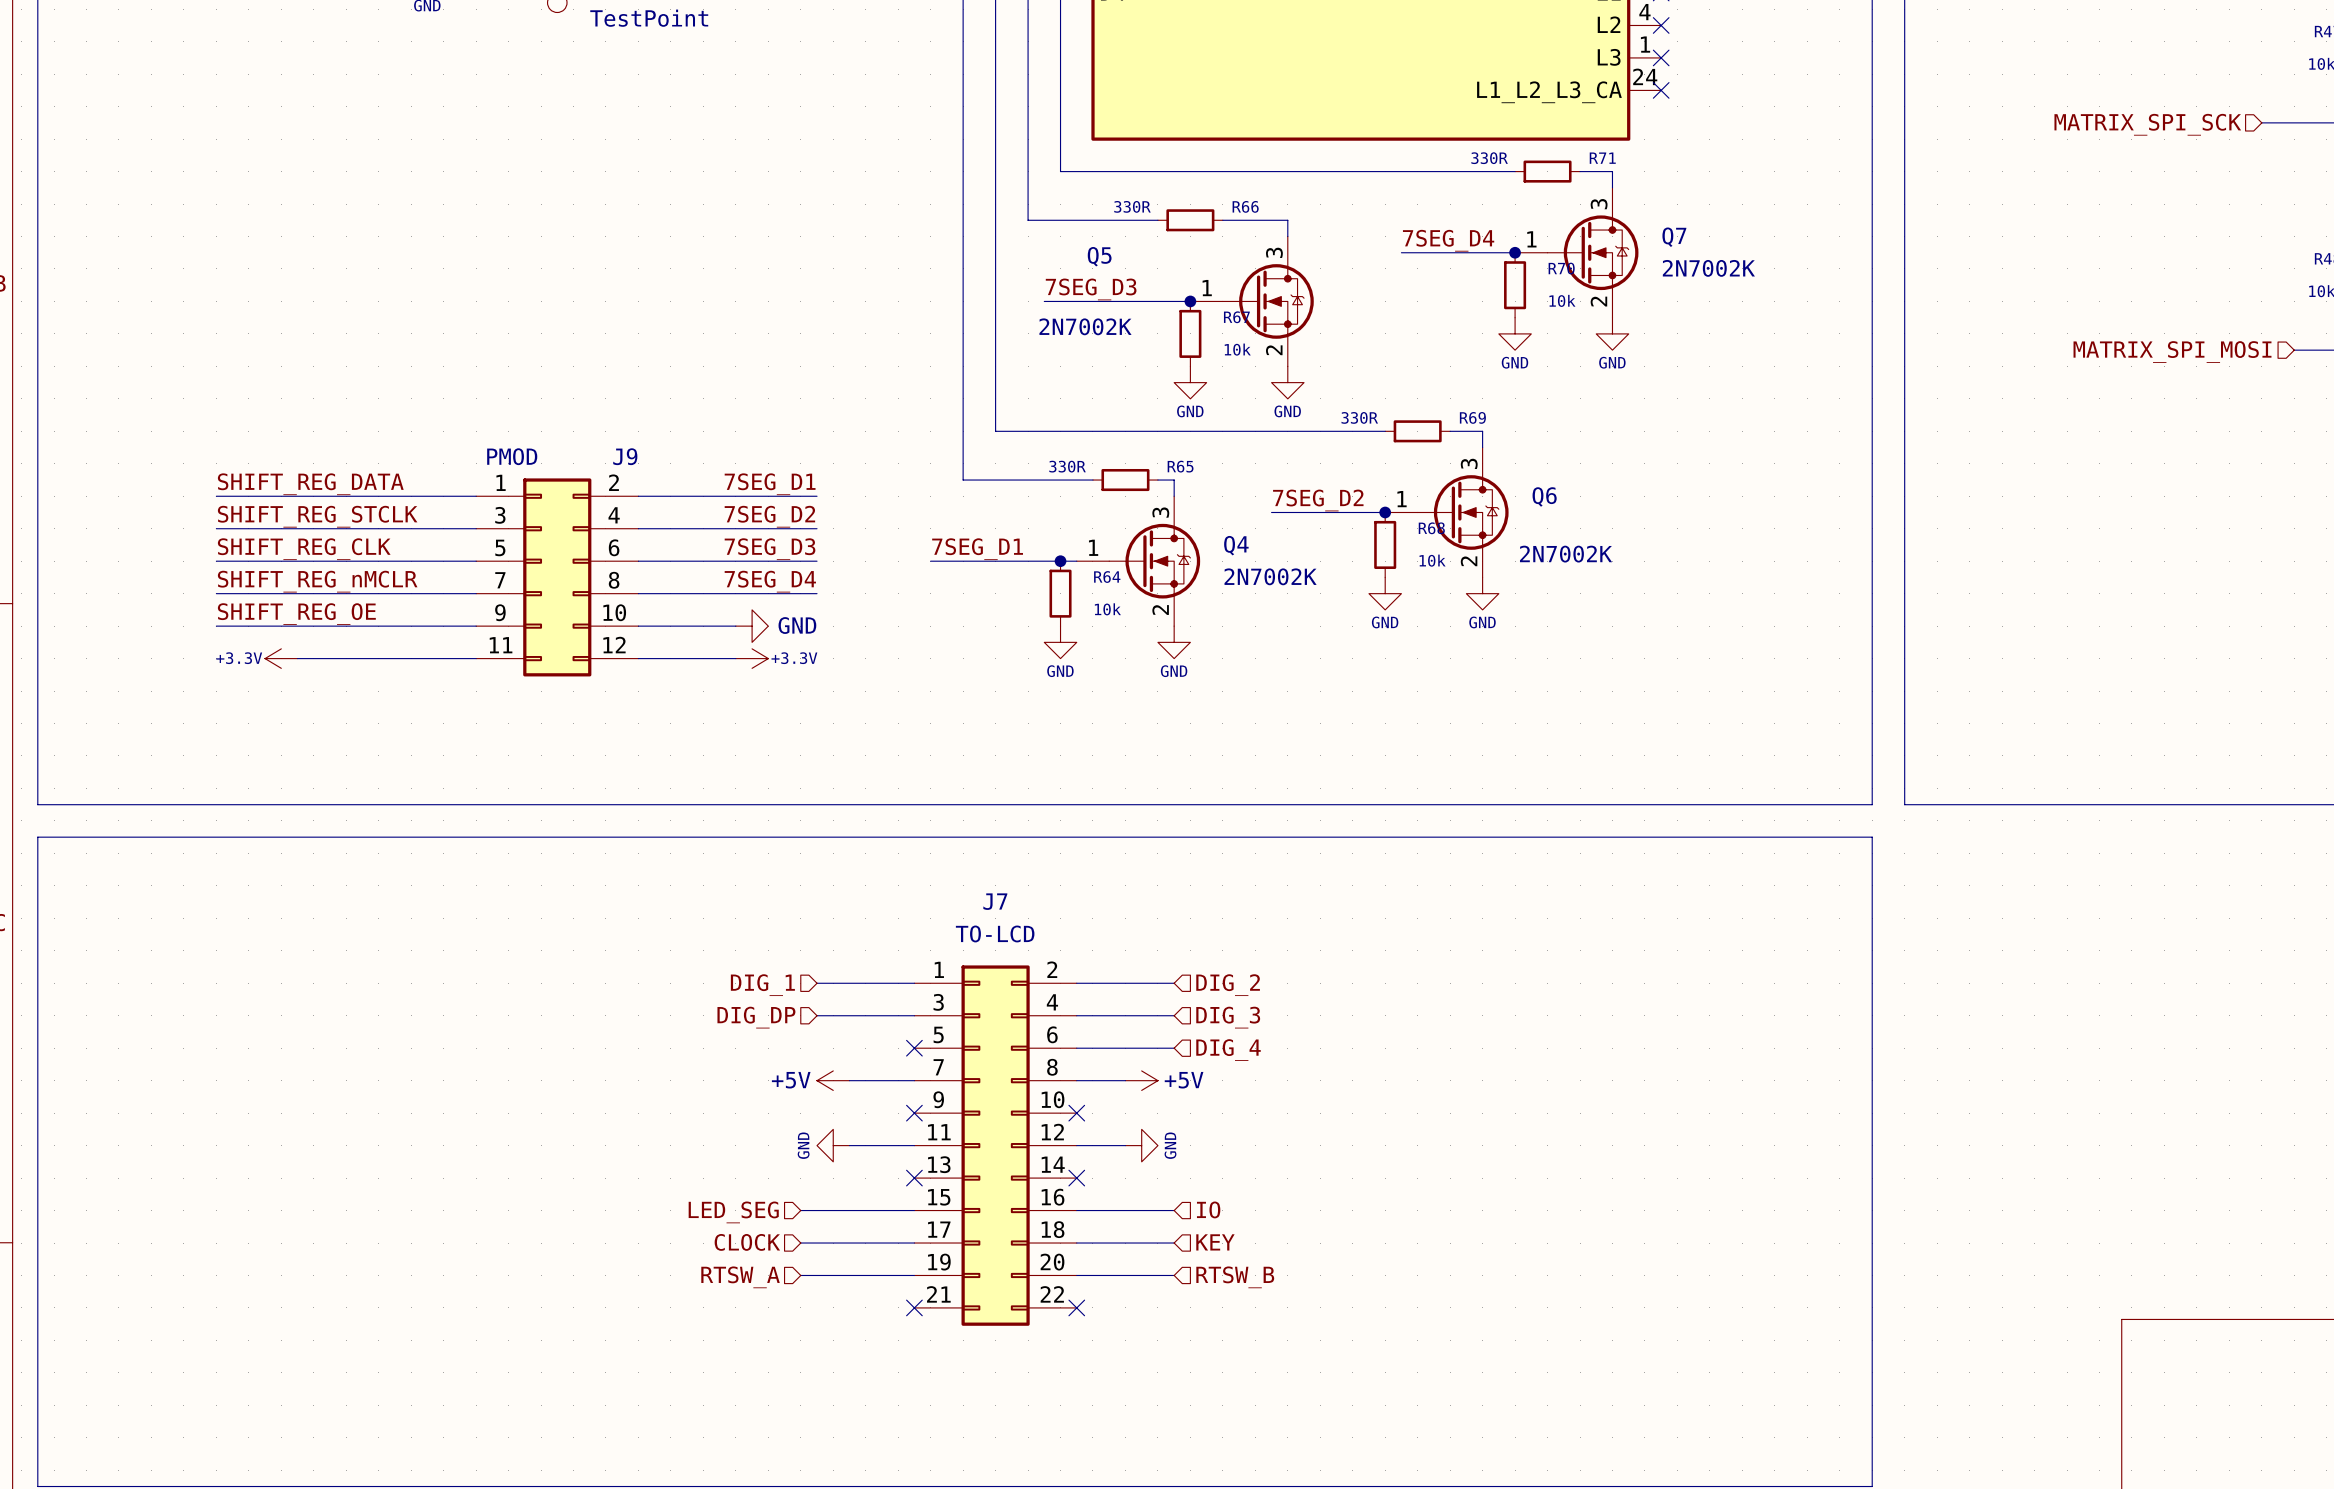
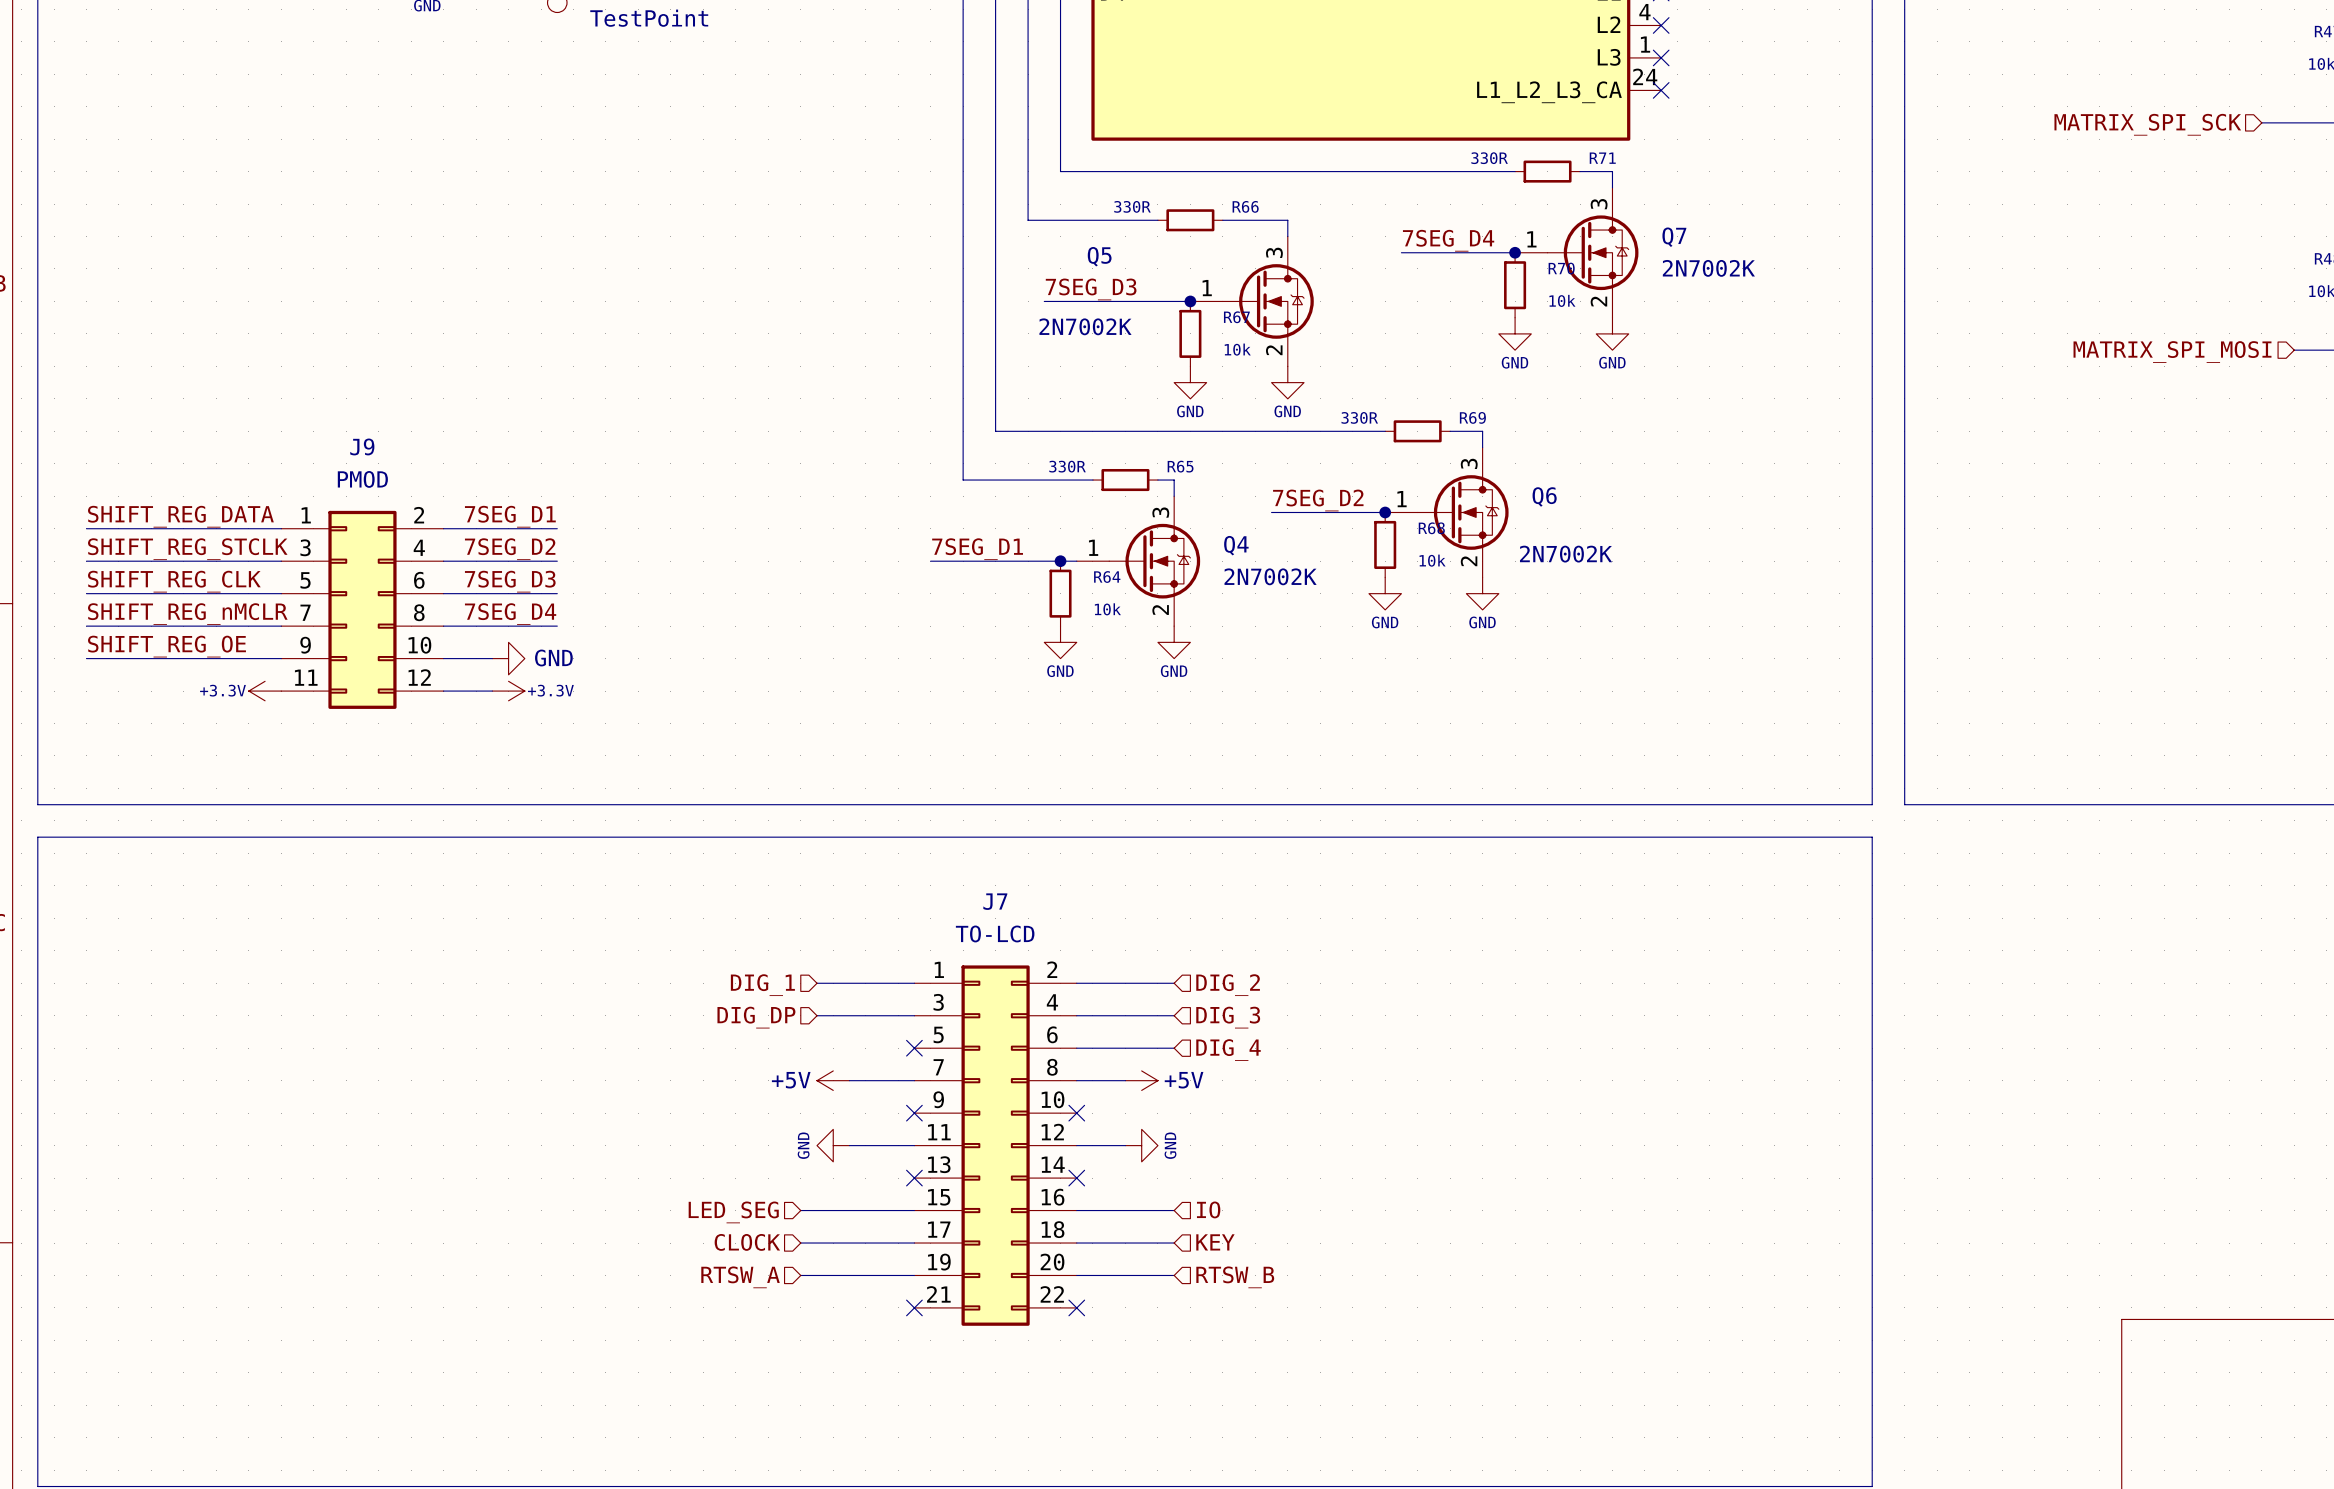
J9 value position: PMOD (512, 456) -> PMOD (362, 479)
J9 name position: J9 (625, 456) -> J9 (362, 446)
label position: SHIFT_REG_DATA (310, 484) -> SHIFT_REG_DATA (180, 516)
label position: 7SEG_D1 (770, 484) -> 7SEG_D1 (510, 516)
wire: (216, 496) (476, 496) -> none
wire: (638, 496) (817, 496) -> none
label position: SHIFT_REG_STCLK (317, 516) -> SHIFT_REG_STCLK (187, 549)
label position: 7SEG_D2 (769, 516) -> 7SEG_D2 (510, 549)
wire: none -> (86, 528) (216, 528)
wire: (638, 528) (817, 528) -> none
label position: SHIFT_REG_CLK (304, 549) -> SHIFT_REG_CLK (174, 581)
label position: 7SEG_D3 (770, 549) -> 7SEG_D3 (510, 581)
wire: none -> (86, 561) (216, 561)
wire: (638, 561) (817, 561) -> none
J9 position: (557, 577) -> (362, 609)
label position: SHIFT_REG_nMCLR (317, 581) -> SHIFT_REG_nMCLR (187, 614)
label position: 7SEG_D4 (770, 581) -> 7SEG_D4 (510, 614)
wire: none -> (86, 593) (216, 593)
wire: (638, 593) (817, 593) -> none
label position: SHIFT_REG_OE (296, 614) -> SHIFT_REG_OE (166, 646)
wire: none -> (86, 626) (216, 626)
wire: (638, 626) (735, 626) -> none
power symbol position: GND (752, 626) -> GND (508, 658)
wire: none -> (86, 658) (281, 658)
power symbol position: +3.3V (281, 658) -> +3.3V (265, 691)
wire: (638, 658) (735, 658) -> none
power symbol: +3.3V (752, 658) -> none
wire: none -> (443, 691) (492, 691)
power symbol: none -> +3.3V (508, 691)

